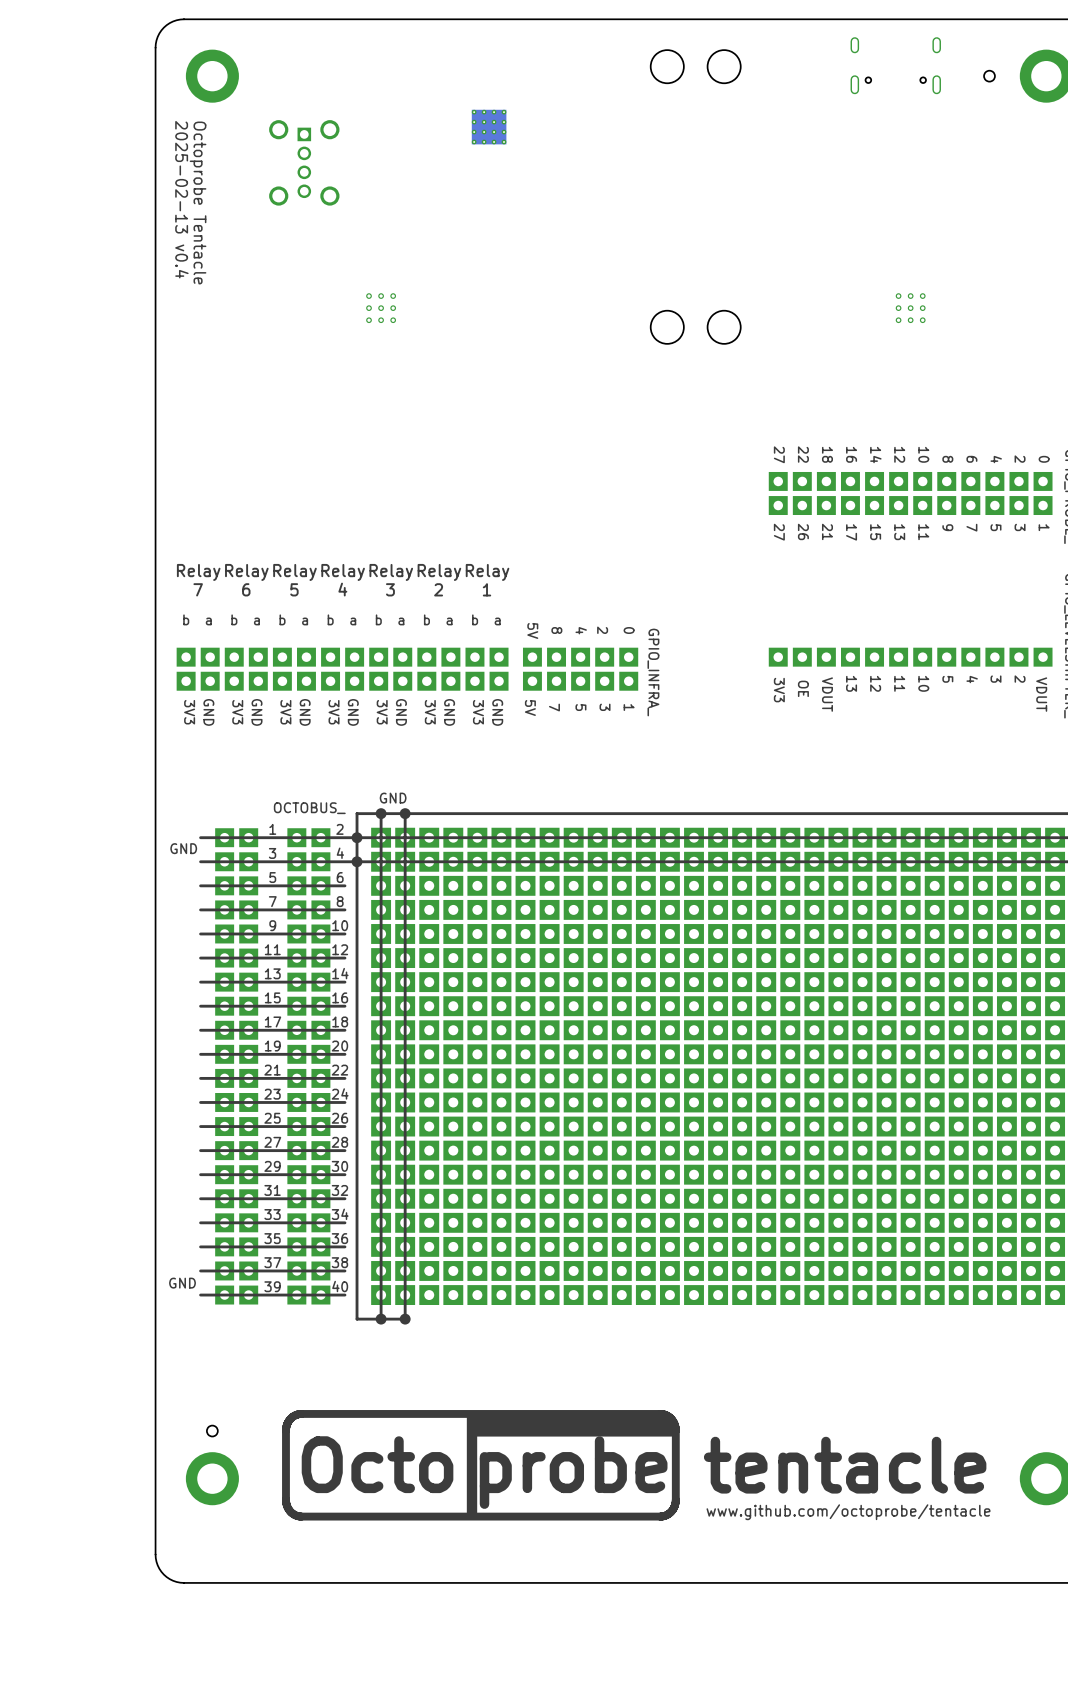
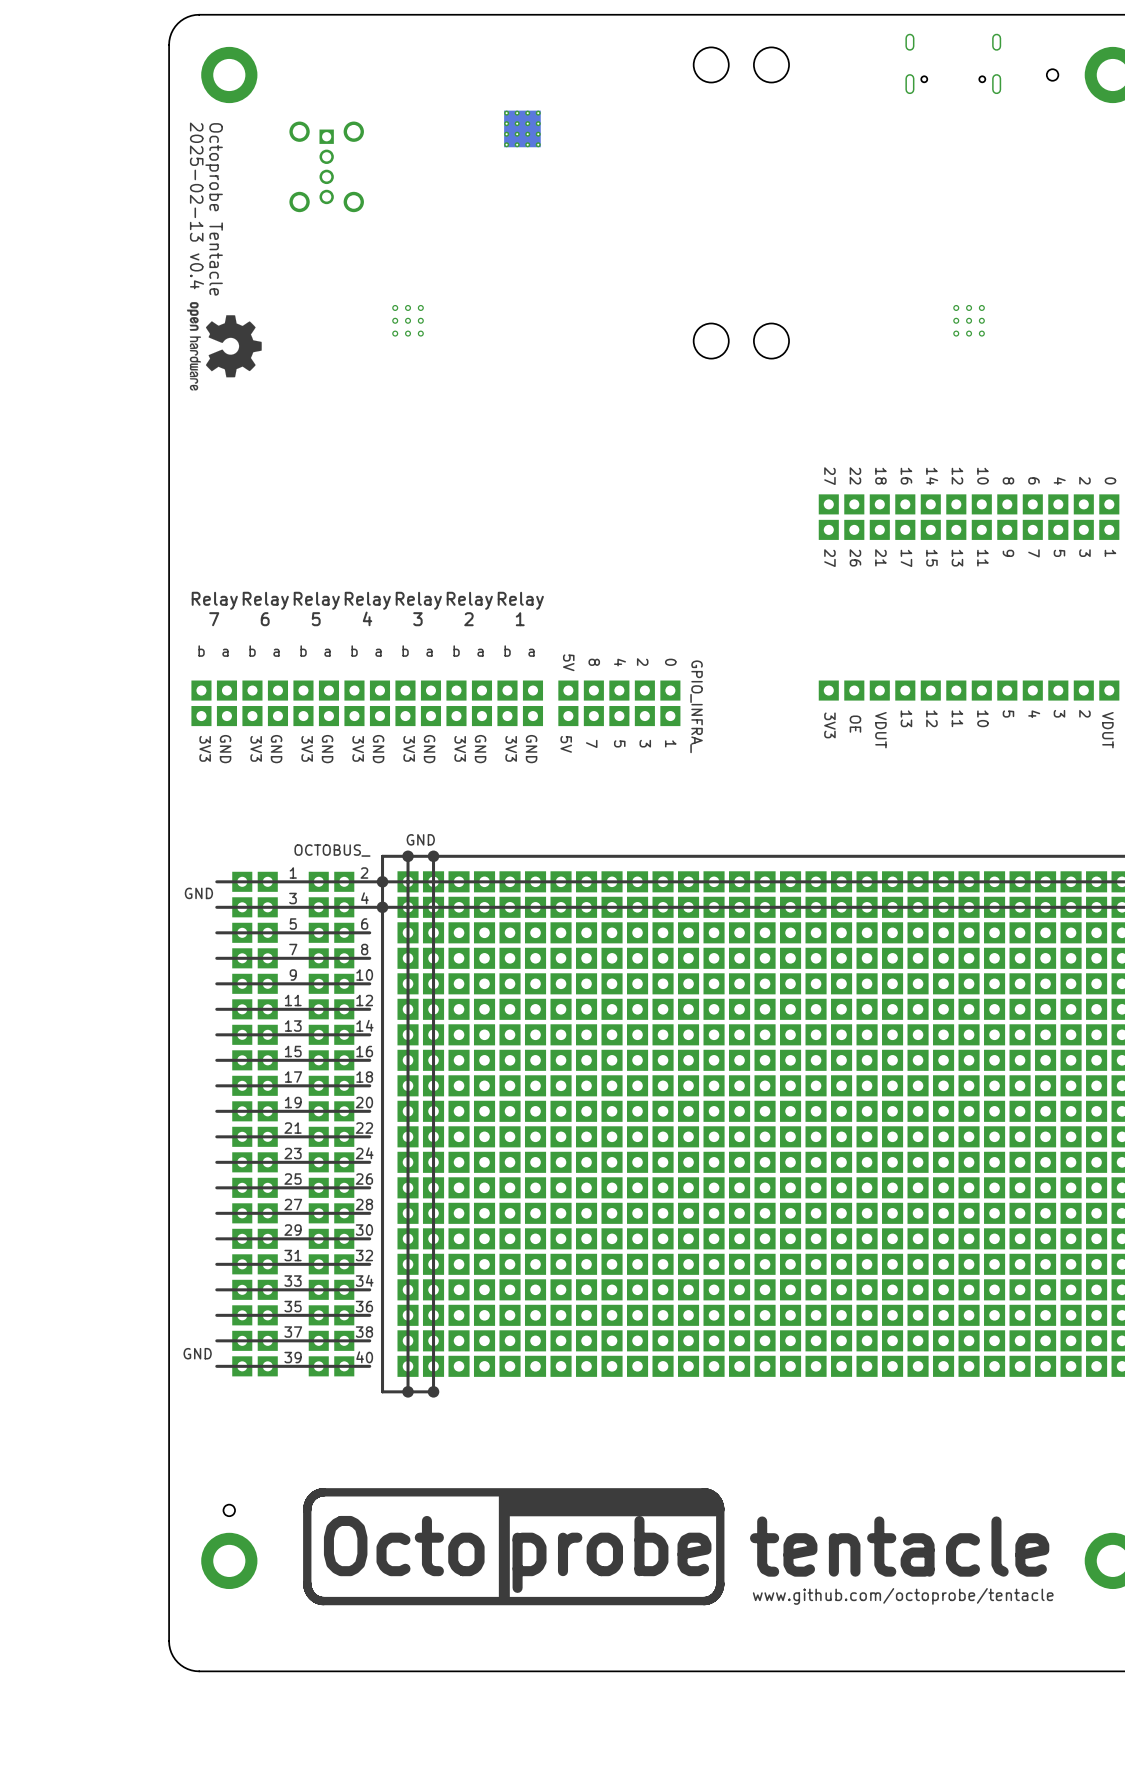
drawing: none -> [186, 302, 262, 391]

